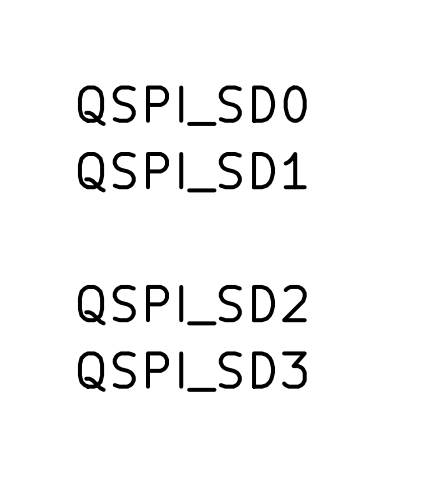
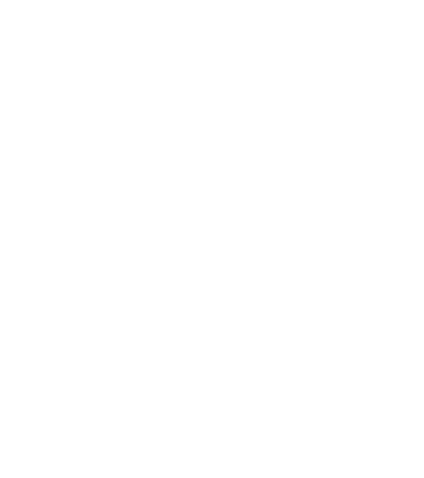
label: QSPI_SD0 (192, 105) -> none
label: QSPI_SD1 (192, 172) -> none
label: QSPI_SD2 (192, 305) -> none
label: QSPI_SD3 (192, 371) -> none

